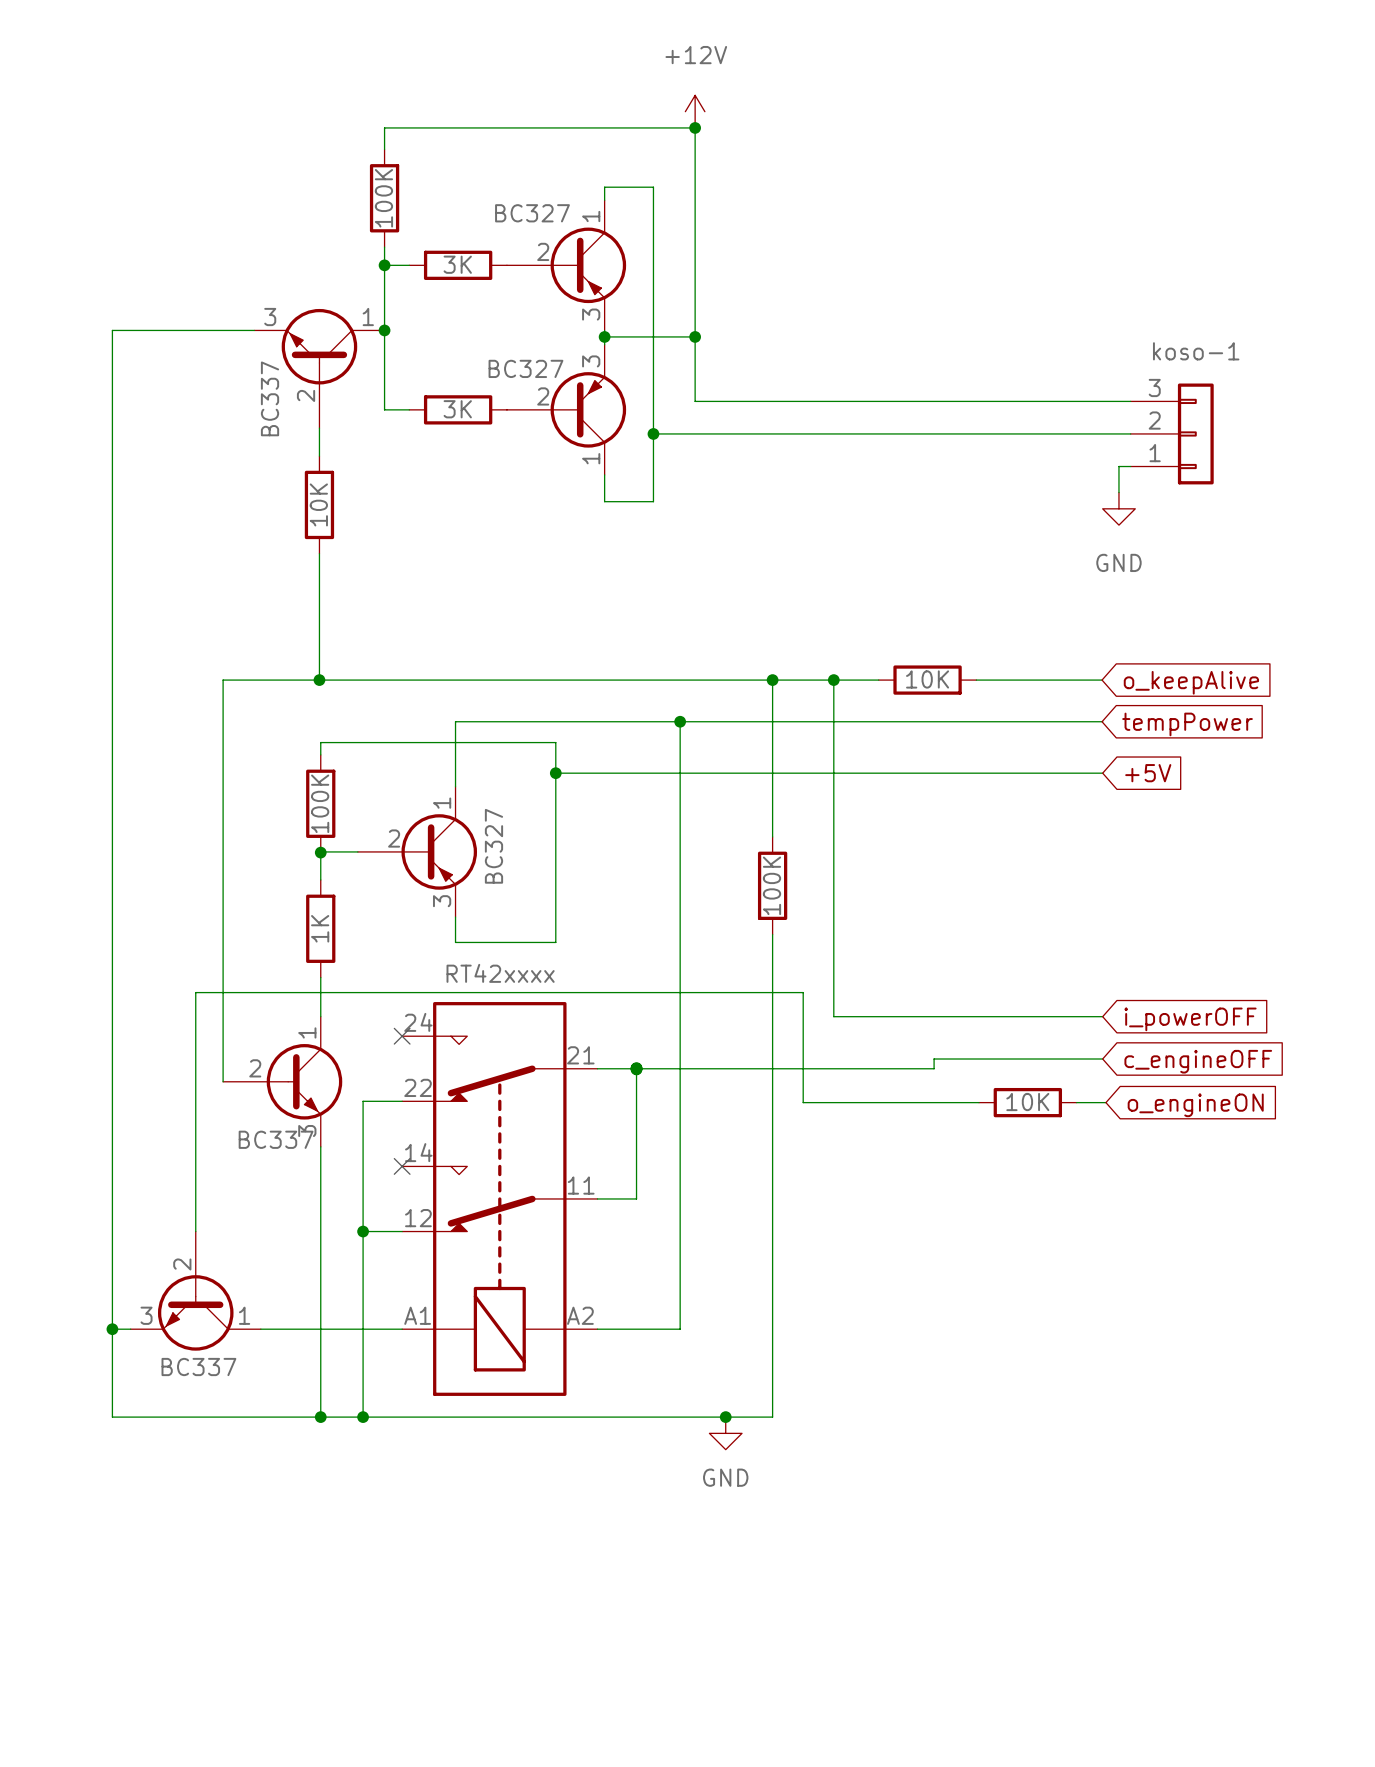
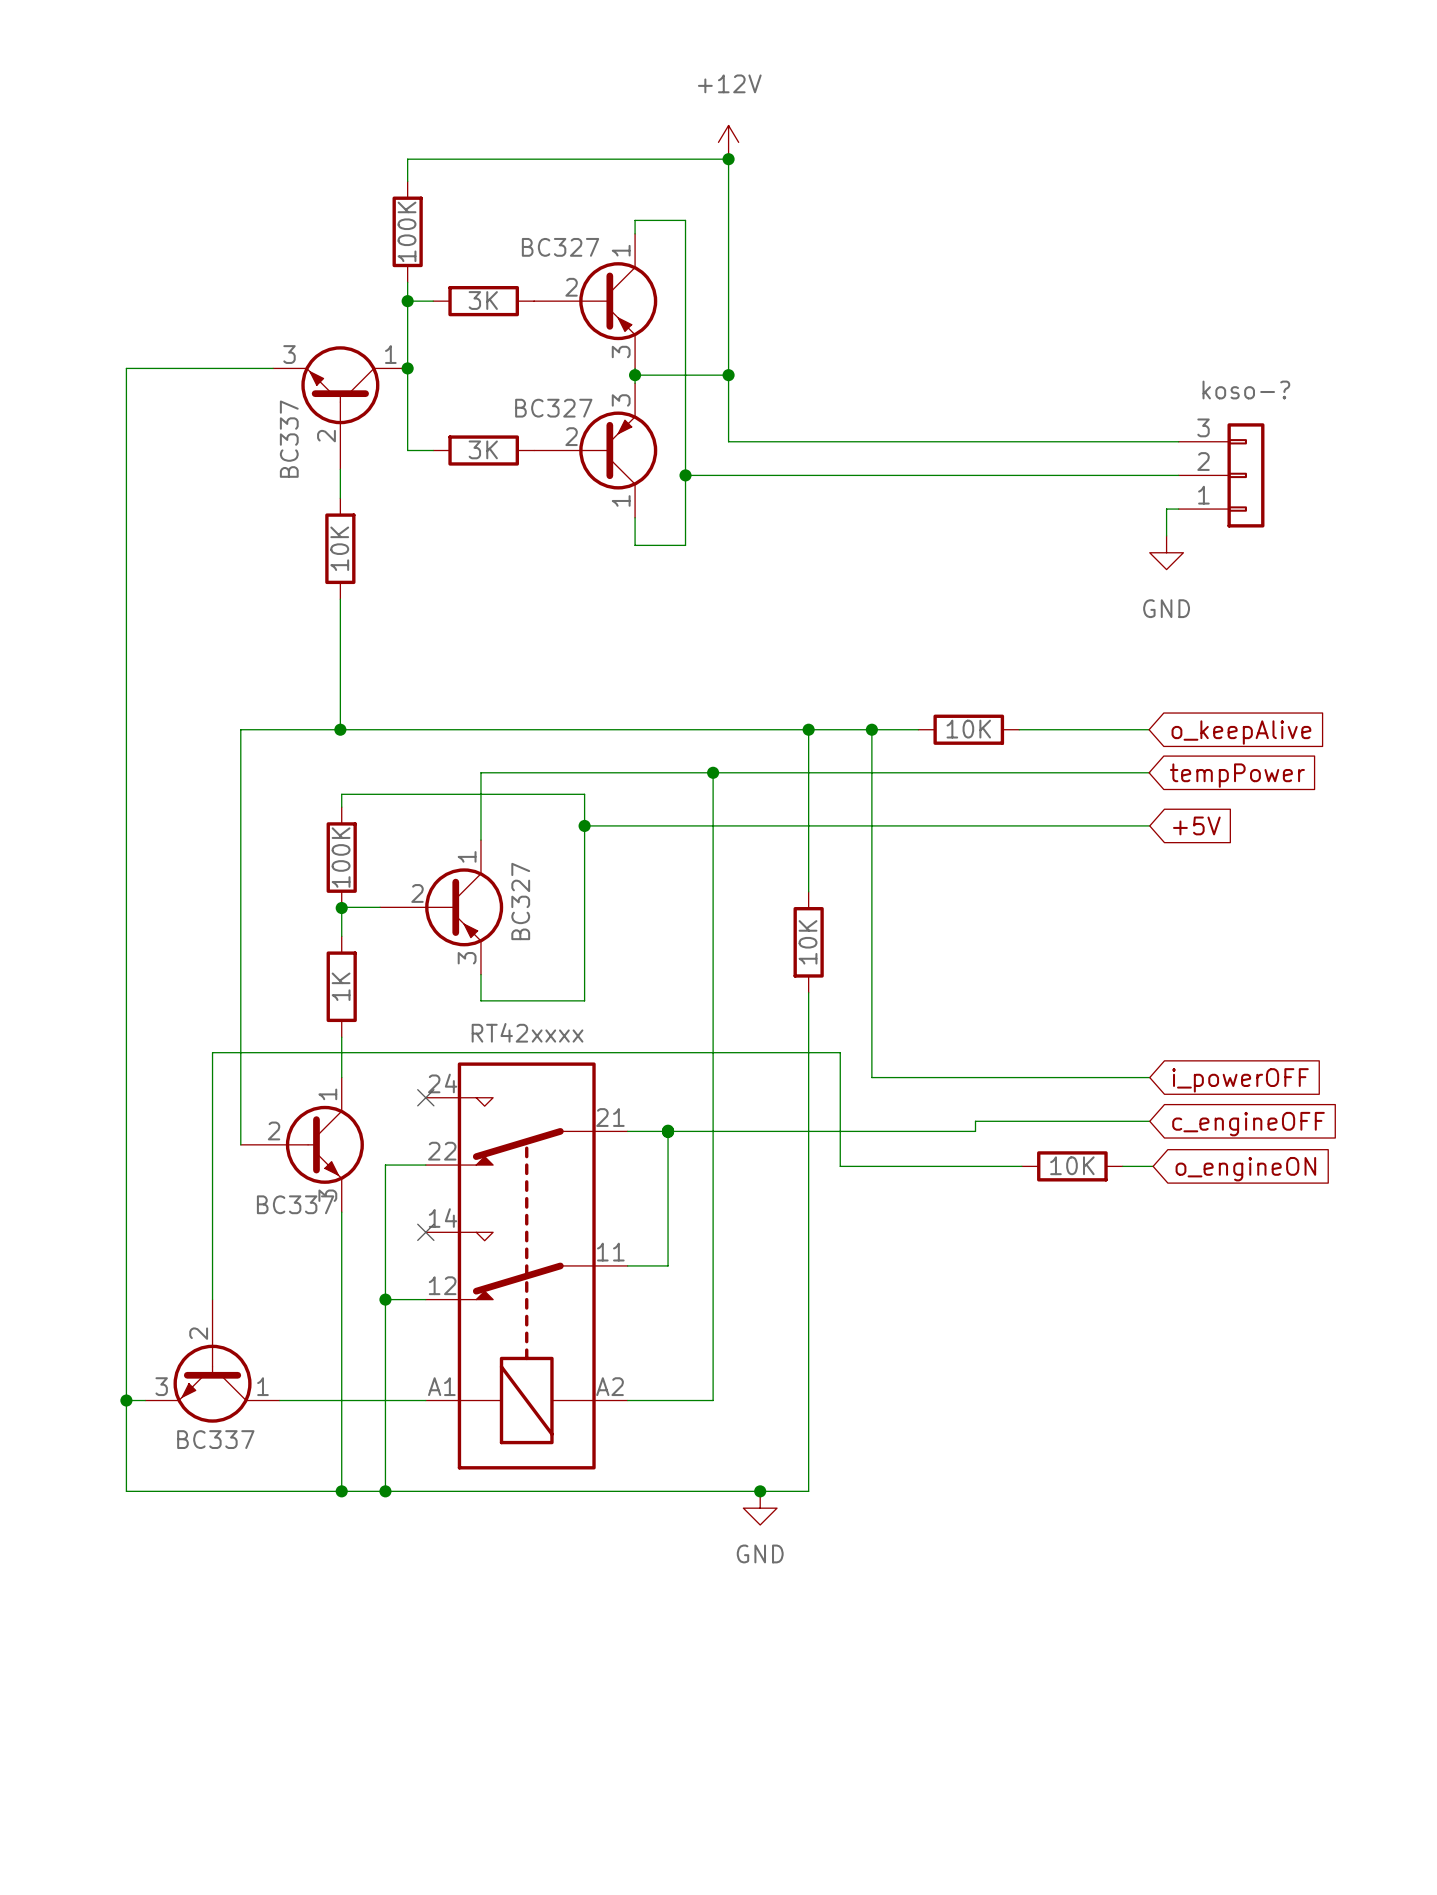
koso-1 name: koso-1 (1196, 351) -> koso-? (1246, 390)
part value: 100K (771, 885) -> 10K (808, 942)

